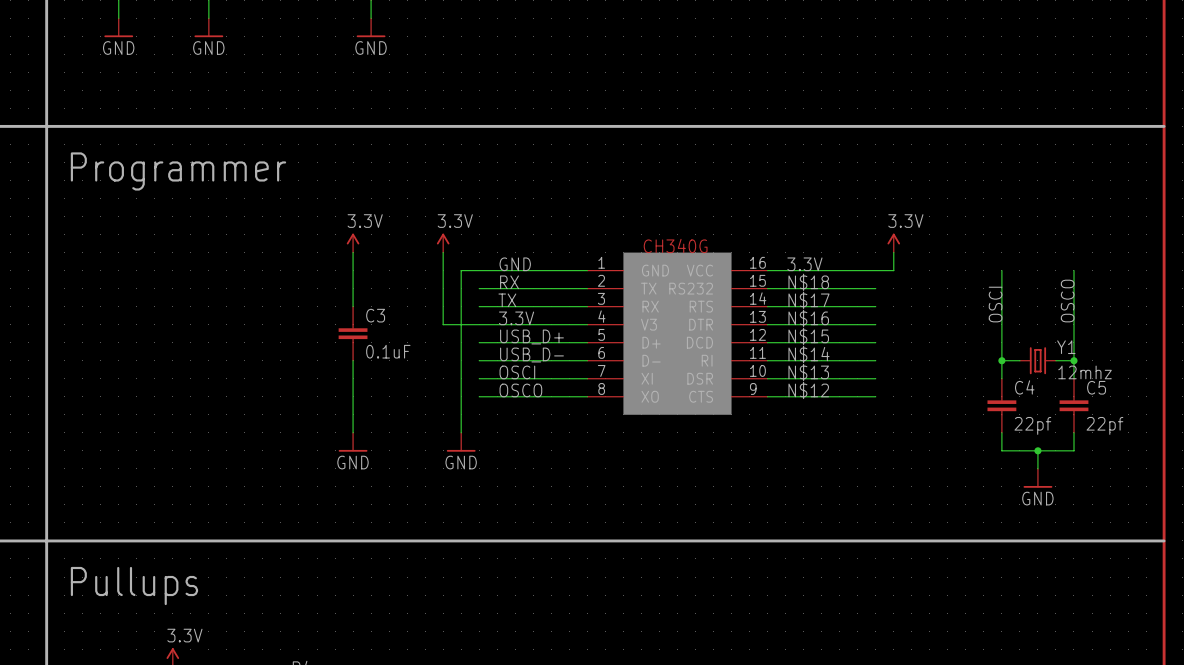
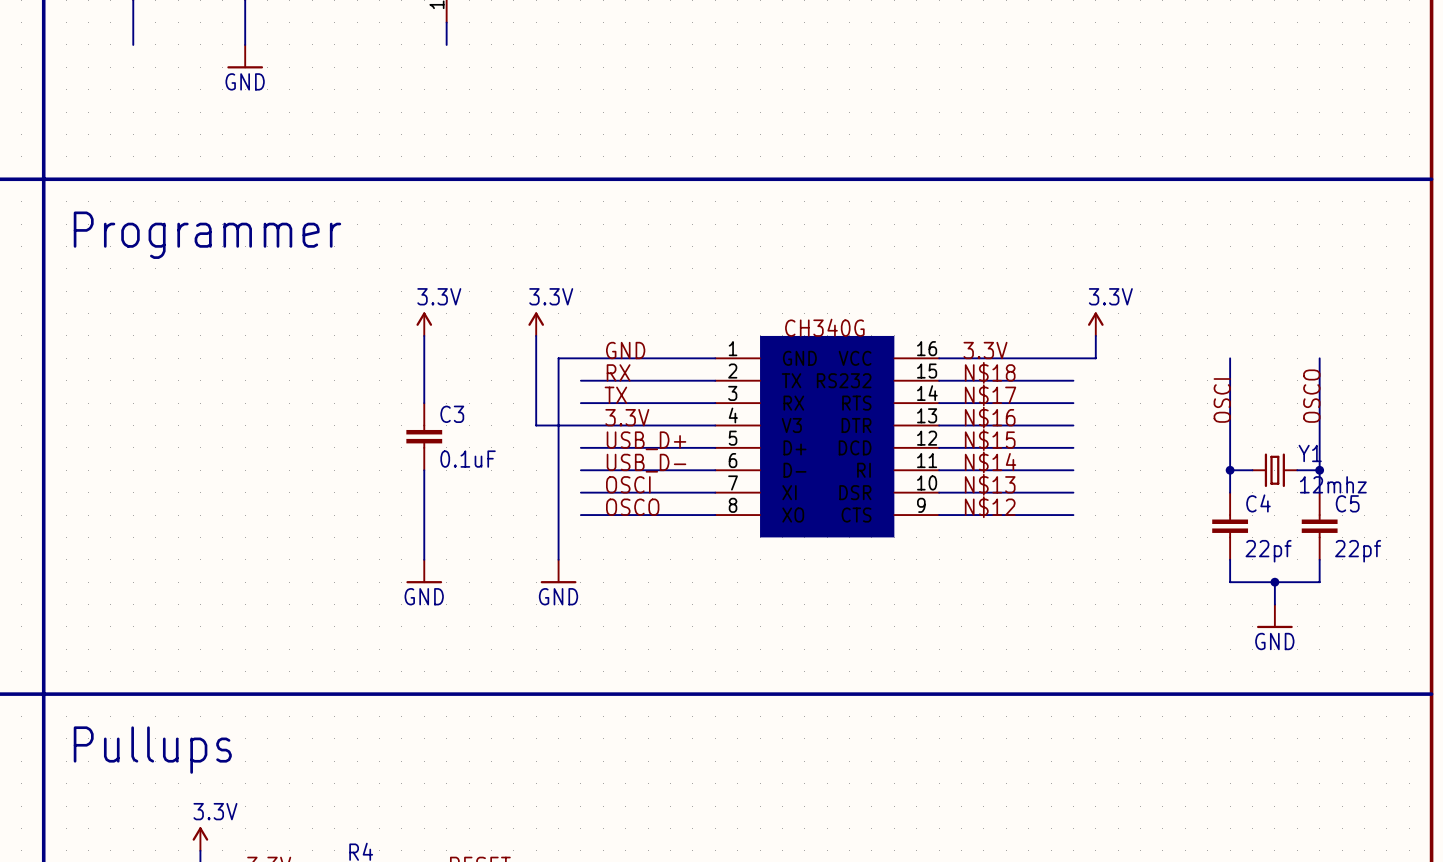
power symbol: GND (118, 27) -> none
power symbol: GND (371, 27) -> none

